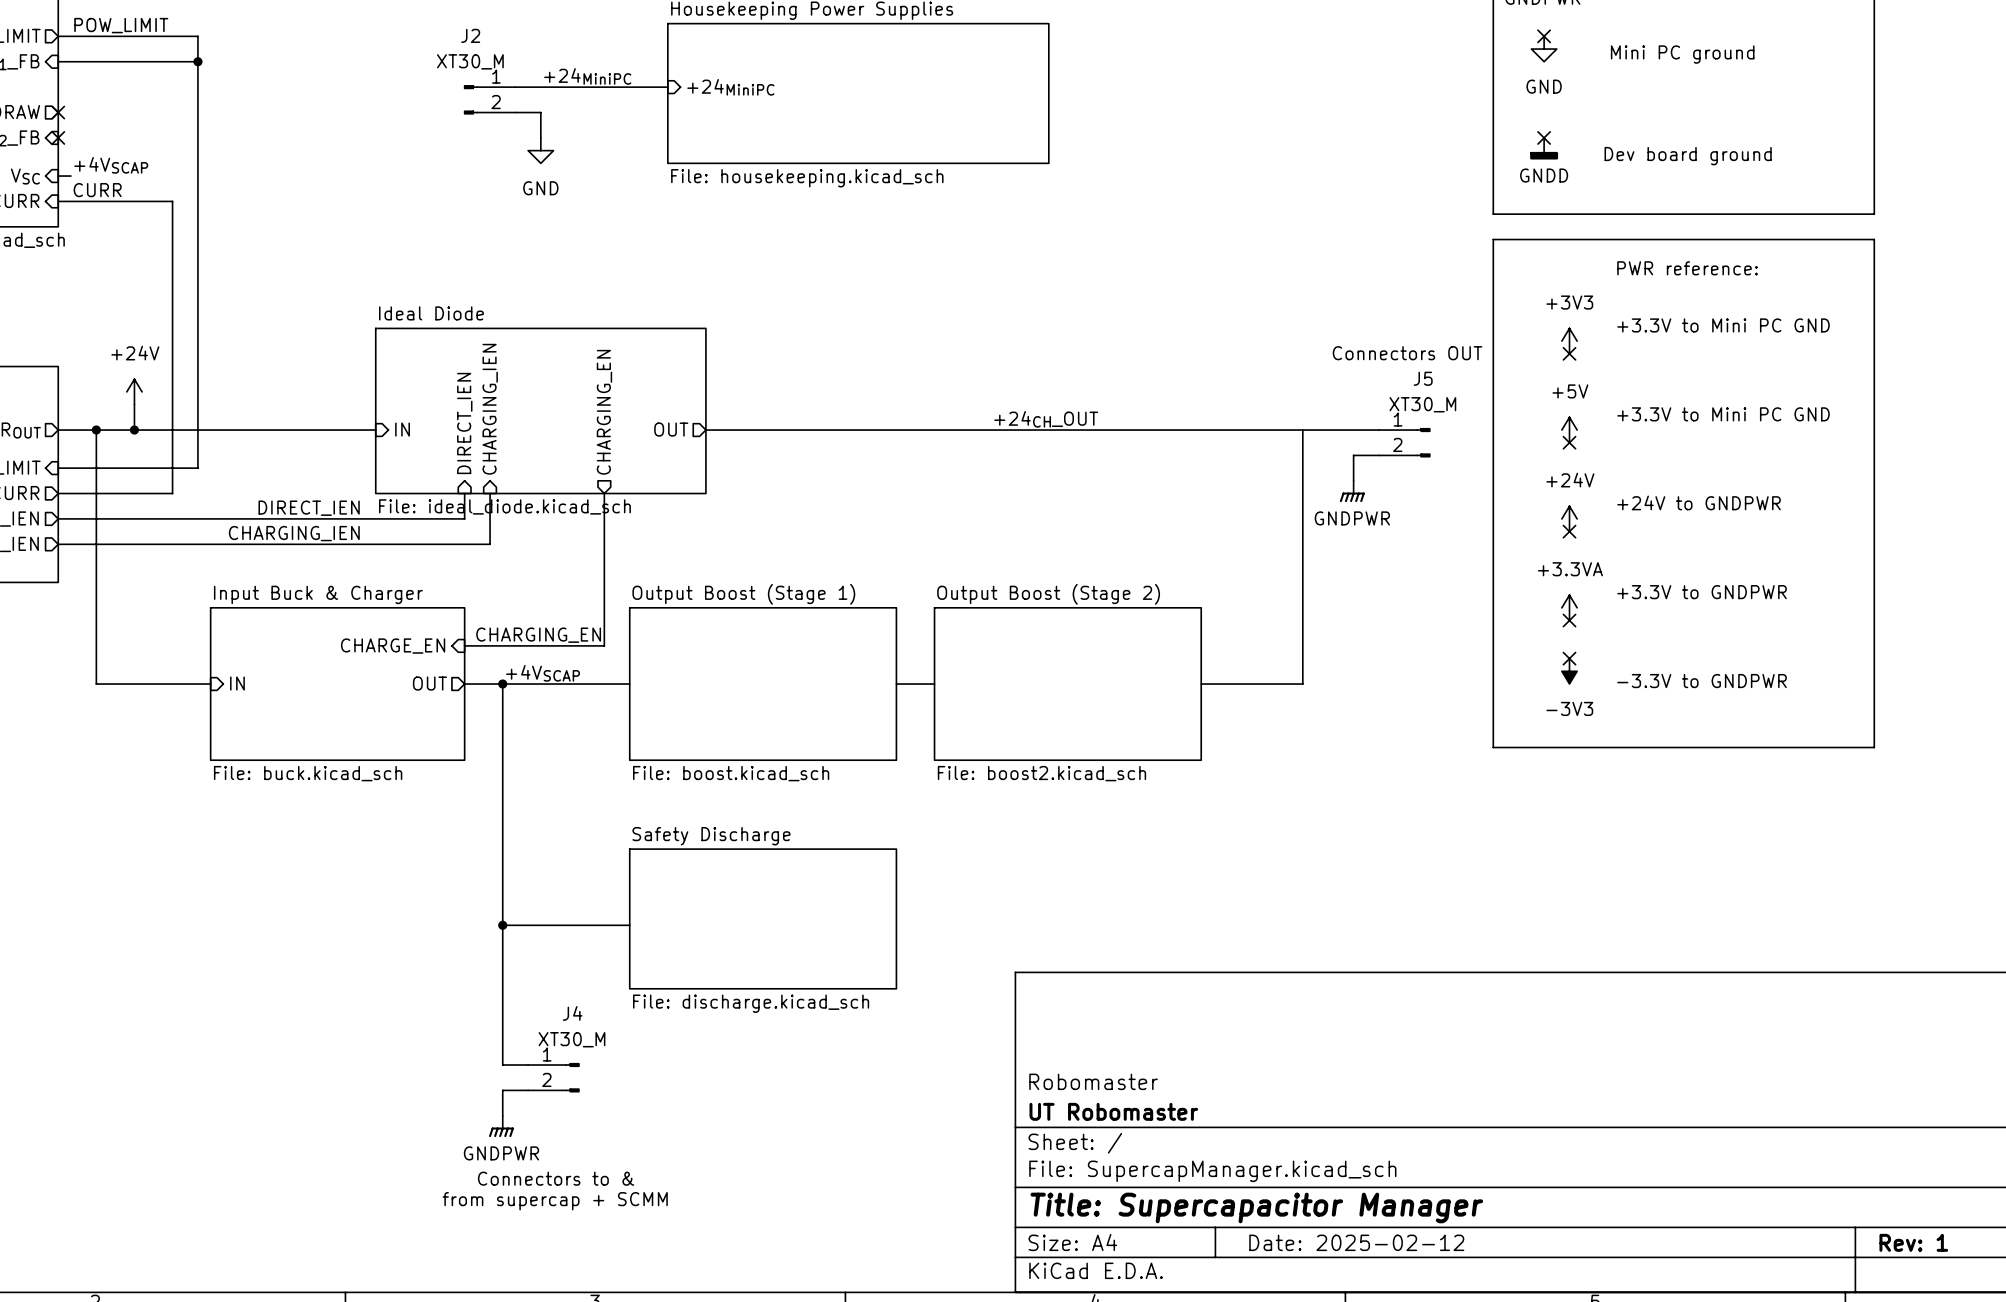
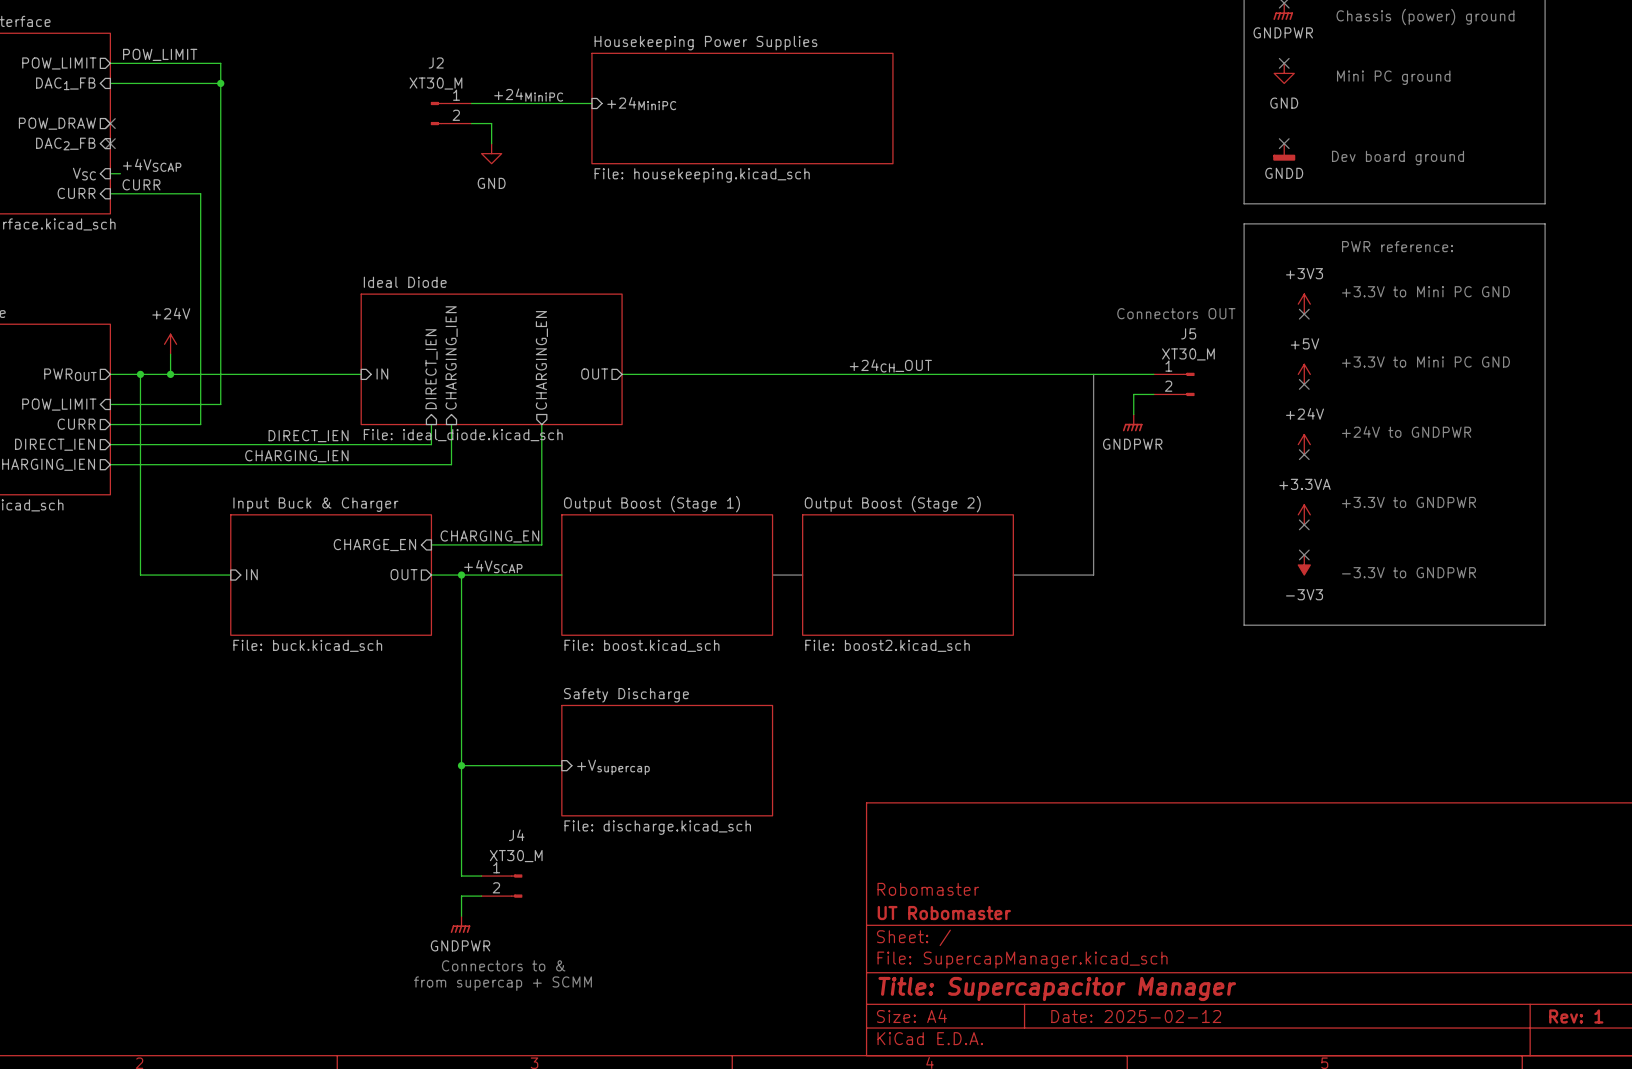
sheet pin: none -> +Vsupercap (613, 767)

